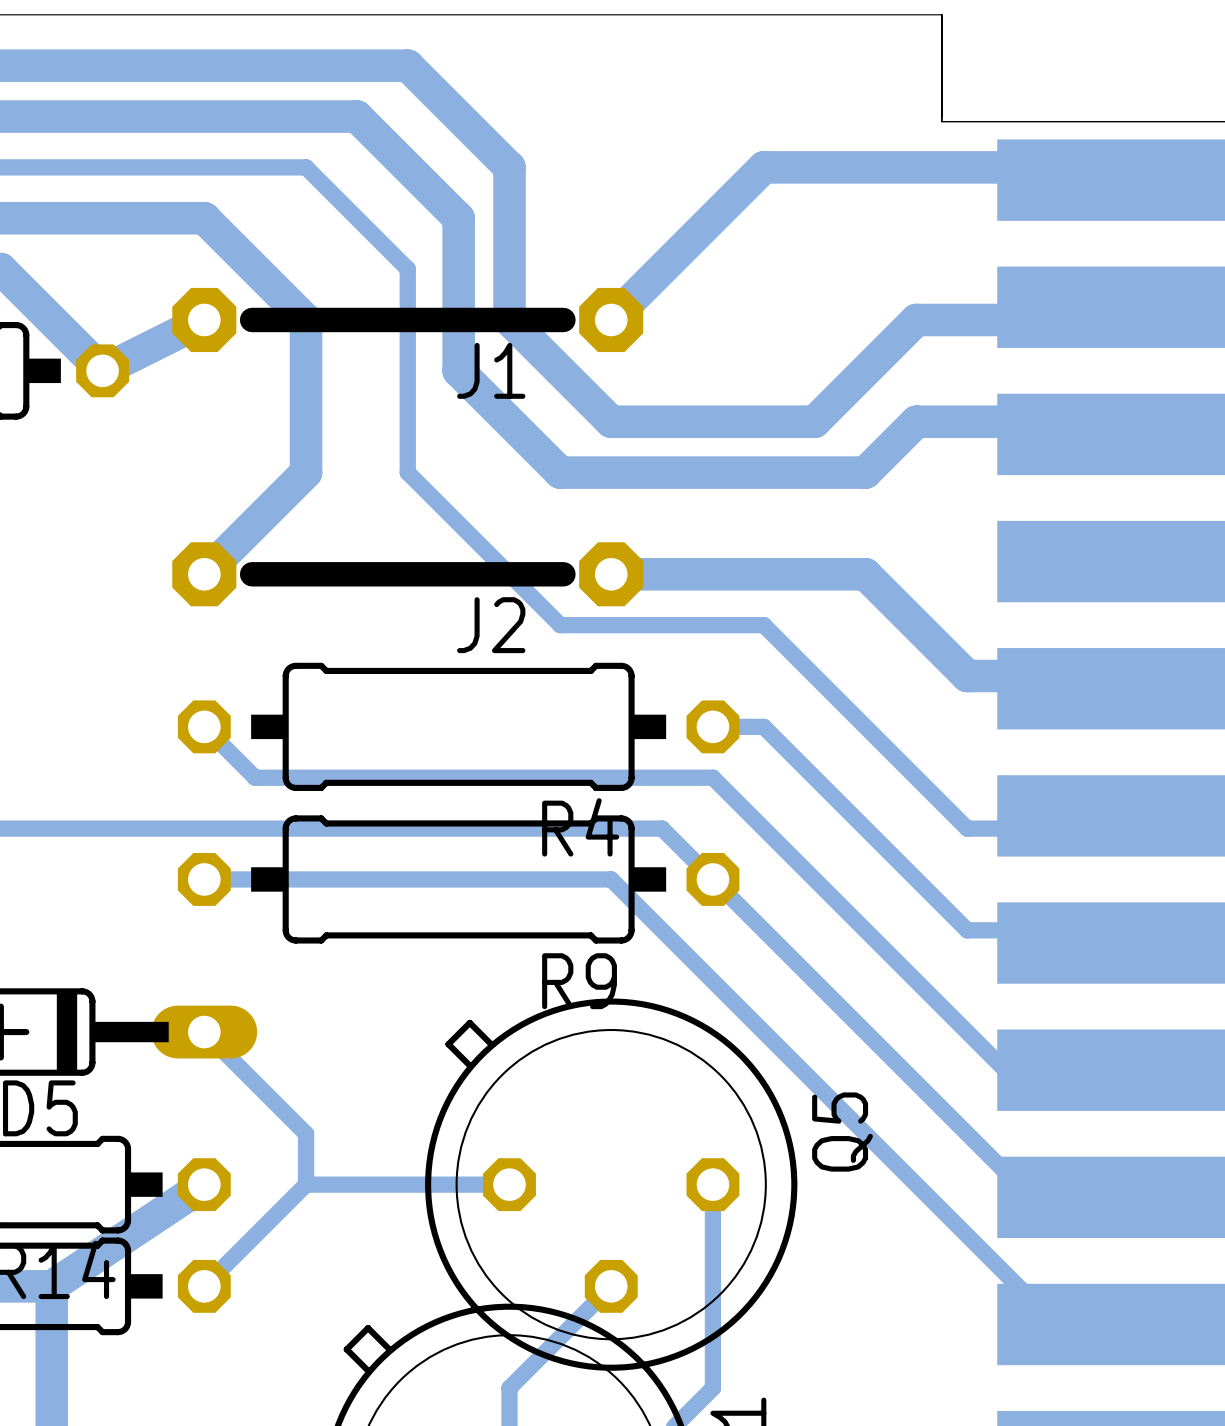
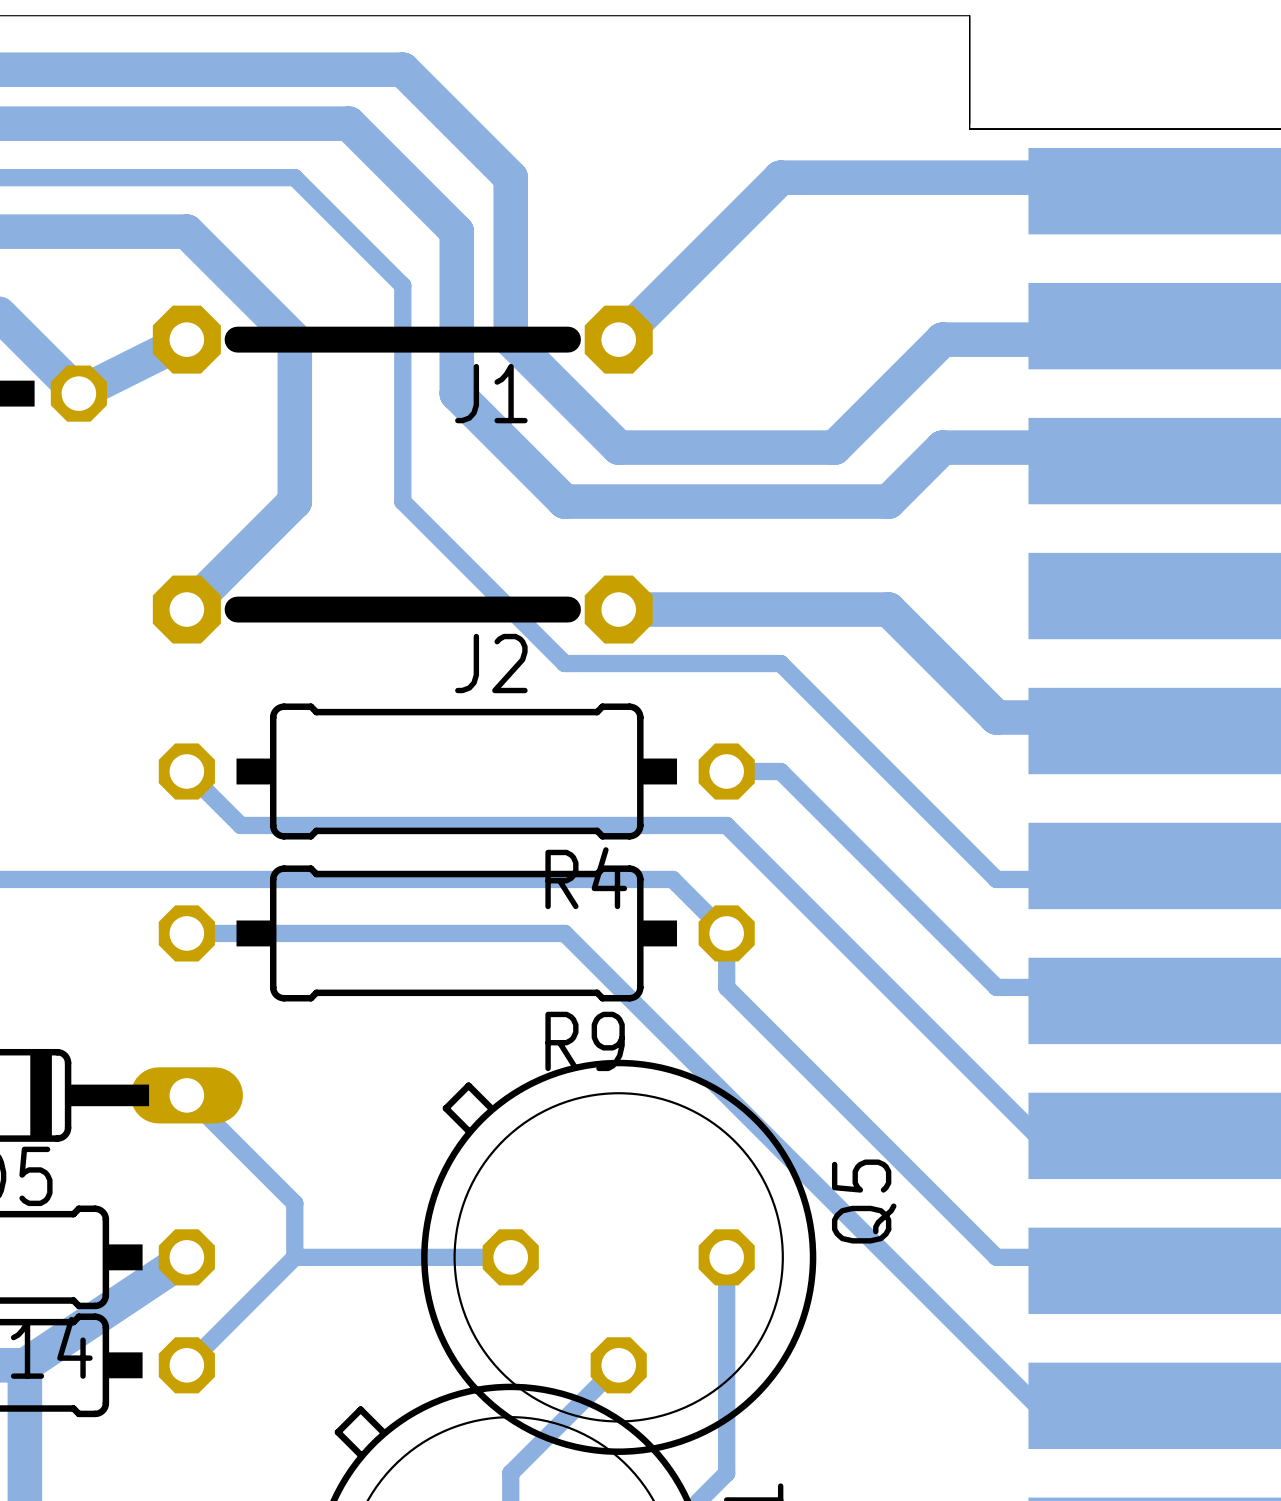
bottom track: (560, 879) (611, 879) (1068, 1337) -> (564, 933) (1050, 1419) (1104, 1419)
bottom track: (712, 879) (1018, 1184) -> (726, 933) (726, 987) (996, 1257) (1050, 1257)

